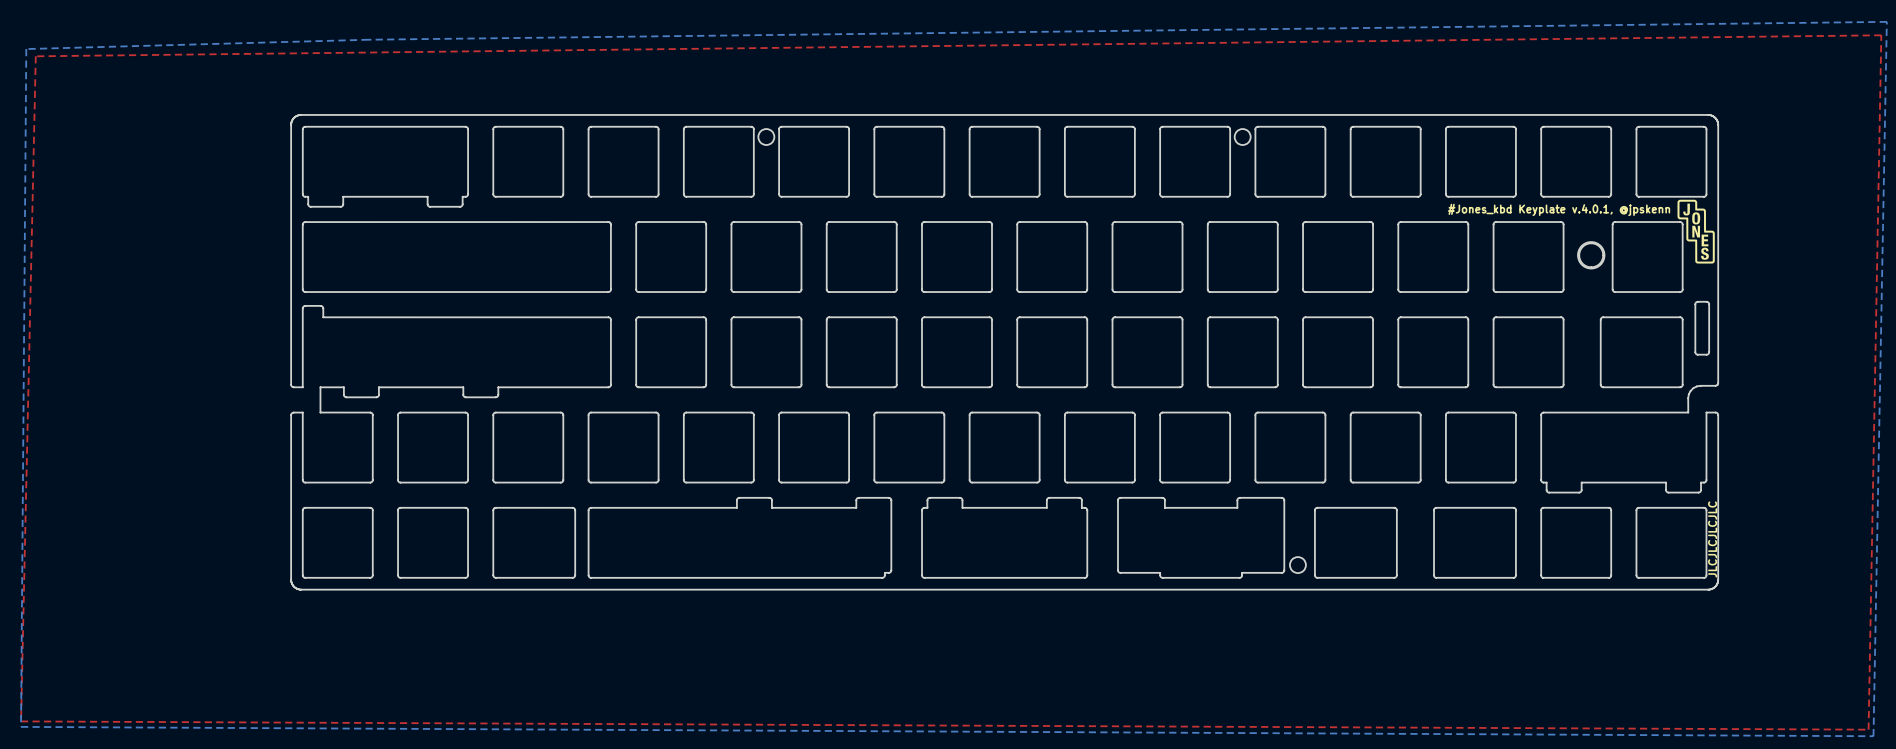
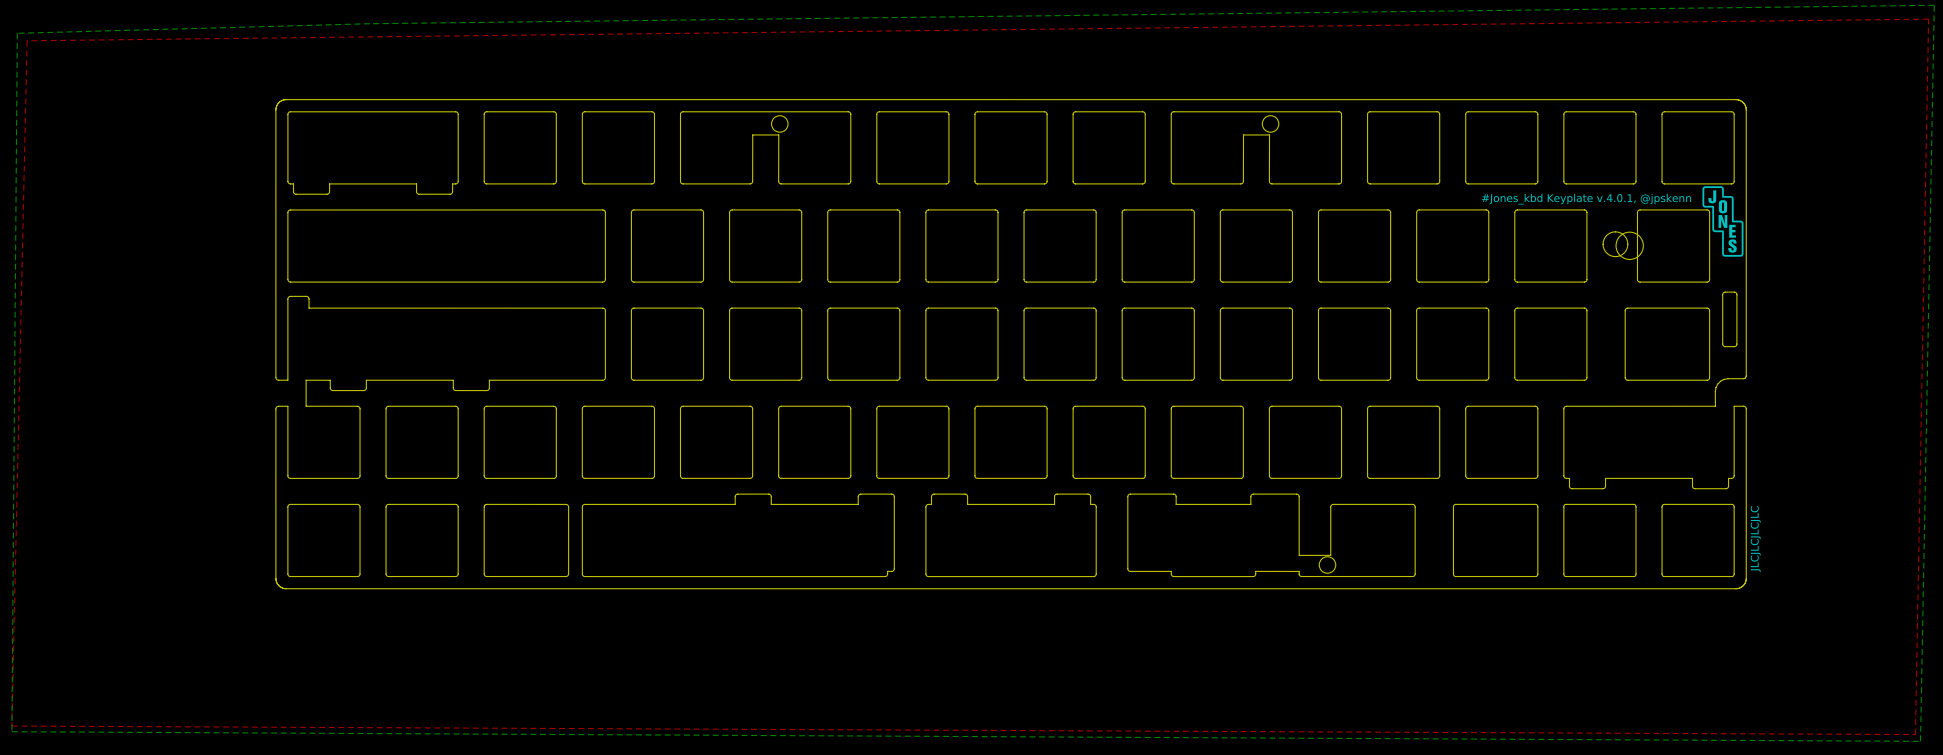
board edge: (1708, 114) (298, 115) (293, 119) (291, 124) (292, 386) (302, 387) (302, 308) (305, 305) (322, 306) (323, 317) (608, 317) (610, 319) (610, 384) (608, 387) (498, 387) (498, 395) (495, 397) (465, 397) (463, 387) (378, 387) (377, 397) (346, 397) (343, 395) (343, 387) (320, 387) (320, 412) (372, 413) (372, 480) (370, 482) (303, 482) (302, 412) (291, 413) (291, 582) (295, 587) (301, 589) (1711, 589) (1716, 585) (1718, 579) (1717, 412) (1706, 412) (1706, 480) (1701, 482) (1699, 492) (1667, 492) (1666, 482) (1581, 482) (1579, 492) (1548, 492) (1546, 490) (1546, 482) (1541, 480) (1542, 412) (1688, 412) (1688, 394) (1693, 388) (1717, 385) (1718, 124) (1715, 117) (1708, 114) -> (1735, 99) (1743, 102) (1746, 109) (1745, 377) (1720, 381) (1715, 387) (1715, 406) (1565, 406) (1563, 475) (1569, 478) (1569, 486) (1571, 488) (1603, 488) (1605, 478) (1692, 478) (1694, 488) (1726, 488) (1728, 478) (1734, 476) (1734, 406) (1745, 406) (1746, 578) (1744, 584) (1739, 588) (286, 588) (280, 586) (276, 581) (276, 407) (287, 406) (288, 477) (357, 478) (360, 476) (359, 407) (306, 406) (306, 380) (330, 380) (330, 388) (332, 390) (364, 390) (366, 380) (453, 380) (455, 390) (486, 390) (489, 388) (489, 380) (602, 380) (605, 377) (605, 310) (603, 308) (309, 308) (307, 296) (290, 296) (287, 299) (287, 380) (276, 379) (275, 109) (277, 103) (283, 100) (1735, 99)
board edge: none -> (848, 111) (682, 111) (680, 114) (680, 182) (683, 183) (751, 183) (752, 134) (778, 134) (779, 183) (849, 183) (850, 181) (850, 114) (848, 111)
board edge: none -> (1338, 111) (1172, 111) (1171, 114) (1171, 182) (1173, 183) (1241, 183) (1243, 134) (1269, 134) (1270, 183) (1339, 183) (1341, 181) (1341, 114) (1338, 111)
board edge: (465, 126) (304, 126) (302, 195) (308, 196) (308, 204) (310, 206) (341, 206) (343, 196) (427, 196) (429, 206) (461, 206) (462, 196) (468, 194) (468, 129) (465, 126) -> (455, 111) (289, 112) (287, 114) (288, 182) (293, 183) (293, 192) (295, 194) (327, 194) (329, 183) (416, 183) (418, 194) (451, 194) (452, 183) (458, 181) (458, 114) (455, 111)
board edge: (560, 126) (494, 127) (494, 196) (562, 196) (563, 129) (560, 126) -> (553, 111) (484, 112) (484, 183) (555, 183) (556, 114) (553, 111)
board edge: (656, 126) (589, 127) (589, 196) (657, 196) (658, 129) (656, 126) -> (651, 111) (583, 112) (583, 183) (653, 183) (654, 114) (651, 111)
board edge: (751, 126) (684, 127) (684, 196) (753, 196) (753, 129) (751, 126) -> none
board edge: (846, 126) (779, 127) (779, 196) (848, 196) (849, 129) (846, 126) -> none
board edge: (941, 126) (875, 127) (875, 196) (943, 196) (944, 129) (941, 126) -> (946, 111) (877, 112) (877, 183) (948, 183) (948, 114) (946, 111)
board edge: (1037, 126) (970, 127) (970, 196) (1038, 196) (1039, 129) (1037, 126) -> (1044, 111) (975, 112) (975, 183) (1046, 183) (1047, 114) (1044, 111)
board edge: (1132, 126) (1065, 127) (1065, 196) (1134, 196) (1134, 129) (1132, 126) -> (1142, 111) (1073, 112) (1073, 183) (1144, 183) (1145, 114) (1142, 111)
board edge: (1227, 126) (1160, 127) (1160, 196) (1229, 196) (1230, 129) (1227, 126) -> none
board edge: (1322, 126) (1256, 127) (1256, 196) (1324, 196) (1325, 129) (1322, 126) -> none
board edge: (1418, 126) (1351, 127) (1351, 196) (1419, 196) (1420, 129) (1418, 126) -> (1437, 111) (1368, 112) (1368, 183) (1438, 183) (1439, 114) (1437, 111)
board edge: (1513, 126) (1446, 127) (1446, 196) (1515, 196) (1515, 129) (1513, 126) -> (1535, 111) (1466, 112) (1466, 183) (1537, 183) (1537, 114) (1535, 111)
board edge: (1608, 126) (1541, 127) (1541, 196) (1610, 196) (1611, 129) (1608, 126) -> (1633, 111) (1564, 112) (1564, 183) (1635, 183) (1636, 114) (1633, 111)
board edge: (1703, 126) (1637, 127) (1637, 196) (1705, 196) (1706, 129) (1703, 126) -> (1731, 111) (1662, 112) (1662, 183) (1733, 183) (1734, 114) (1731, 111)
drawing: none -> [1702, 186, 1744, 257]
drawing: [1677, 199, 1715, 264] -> none
board edge: (608, 222) (610, 224) (610, 289) (608, 291) (305, 292) (302, 289) (302, 224) (304, 222) (608, 222) -> (602, 209) (605, 212) (605, 279) (603, 282) (290, 282) (287, 279) (287, 212) (290, 210) (602, 209)
board edge: (703, 222) (636, 222) (636, 291) (705, 291) (706, 224) (703, 222) -> (700, 209) (632, 210) (632, 281) (702, 281) (703, 212) (700, 209)
board edge: (798, 222) (732, 222) (732, 291) (800, 291) (801, 224) (798, 222) -> (799, 209) (730, 210) (730, 281) (800, 281) (801, 212) (799, 209)
board edge: (894, 222) (827, 222) (827, 291) (895, 291) (896, 224) (894, 222) -> (897, 209) (828, 210) (828, 281) (899, 281) (899, 212) (897, 209)
board edge: (989, 222) (922, 222) (922, 291) (991, 291) (991, 224) (989, 222) -> (995, 209) (926, 210) (926, 281) (997, 281) (998, 212) (995, 209)
board edge: (1084, 222) (1017, 222) (1017, 291) (1086, 291) (1087, 224) (1084, 222) -> (1093, 209) (1024, 210) (1024, 281) (1095, 281) (1096, 212) (1093, 209)
board edge: (1180, 222) (1113, 222) (1113, 291) (1181, 291) (1182, 224) (1180, 222) -> (1191, 209) (1122, 210) (1122, 281) (1193, 281) (1194, 212) (1191, 209)
board edge: (1275, 222) (1208, 222) (1208, 291) (1277, 291) (1277, 224) (1275, 222) -> (1289, 209) (1221, 210) (1221, 281) (1291, 281) (1292, 212) (1289, 209)
board edge: (1370, 222) (1303, 222) (1303, 291) (1372, 291) (1373, 224) (1370, 222) -> (1388, 209) (1319, 210) (1319, 281) (1389, 281) (1390, 212) (1388, 209)
board edge: (1465, 222) (1399, 222) (1399, 291) (1467, 291) (1468, 224) (1465, 222) -> (1486, 209) (1417, 210) (1417, 281) (1488, 281) (1488, 212) (1486, 209)
board edge: (1561, 222) (1494, 222) (1494, 291) (1562, 291) (1563, 224) (1561, 222) -> (1584, 209) (1515, 210) (1515, 281) (1586, 281) (1586, 212) (1584, 209)
board edge: (1680, 222) (1613, 222) (1613, 291) (1681, 291) (1682, 224) (1680, 222) -> (1707, 209) (1638, 210) (1638, 281) (1708, 281) (1709, 212) (1707, 209)
board edge: (1591, 243) (1582, 246) (1579, 255) (1582, 263) (1591, 267) (1599, 263) (1603, 255) (1599, 246) (1591, 243) -> (1615, 231) (1606, 235) (1603, 244) (1606, 252) (1615, 256) (1624, 252) (1627, 244) (1624, 235) (1615, 231)
board edge: (1706, 301) (1709, 304) (1709, 352) (1707, 354) (1697, 354) (1695, 352) (1695, 303) (1697, 301) (1706, 301) -> (1734, 292) (1736, 294) (1736, 344) (1734, 346) (1724, 346) (1722, 344) (1722, 294) (1724, 292) (1734, 292)
board edge: (703, 317) (636, 318) (636, 386) (705, 386) (706, 319) (703, 317) -> (700, 308) (632, 308) (632, 379) (702, 379) (703, 310) (700, 308)
board edge: (798, 317) (732, 318) (732, 386) (800, 386) (801, 319) (798, 317) -> (799, 308) (730, 308) (730, 379) (800, 379) (801, 310) (799, 308)
board edge: (894, 317) (827, 318) (827, 386) (895, 386) (896, 319) (894, 317) -> (897, 308) (828, 308) (828, 379) (899, 379) (899, 310) (897, 308)
board edge: (989, 317) (922, 318) (922, 386) (991, 386) (991, 319) (989, 317) -> (995, 308) (926, 308) (926, 379) (997, 379) (998, 310) (995, 308)
board edge: (1084, 317) (1017, 318) (1017, 386) (1086, 386) (1087, 319) (1084, 317) -> (1093, 308) (1024, 308) (1024, 379) (1095, 379) (1096, 310) (1093, 308)
board edge: (1180, 317) (1113, 318) (1113, 386) (1181, 386) (1182, 319) (1180, 317) -> (1191, 308) (1122, 308) (1122, 379) (1193, 379) (1194, 310) (1191, 308)
board edge: (1275, 317) (1208, 318) (1208, 386) (1277, 386) (1277, 319) (1275, 317) -> (1289, 308) (1221, 308) (1221, 379) (1291, 379) (1292, 310) (1289, 308)
board edge: (1370, 317) (1303, 318) (1303, 386) (1372, 386) (1373, 319) (1370, 317) -> (1388, 308) (1319, 308) (1319, 379) (1389, 379) (1390, 310) (1388, 308)
board edge: (1465, 317) (1399, 318) (1399, 386) (1467, 386) (1468, 319) (1465, 317) -> (1486, 308) (1417, 308) (1417, 379) (1488, 379) (1488, 310) (1486, 308)
board edge: (1561, 317) (1494, 318) (1494, 386) (1562, 386) (1563, 319) (1561, 317) -> (1584, 308) (1515, 308) (1515, 379) (1586, 379) (1586, 310) (1584, 308)
board edge: (1680, 317) (1601, 317) (1601, 386) (1681, 386) (1682, 319) (1680, 317) -> (1707, 308) (1626, 308) (1625, 379) (1708, 379) (1709, 310) (1707, 308)
board edge: (465, 412) (398, 413) (398, 481) (467, 481) (468, 415) (465, 412) -> (455, 406) (386, 407) (386, 477) (457, 477) (458, 408) (455, 406)
board edge: (560, 412) (494, 413) (494, 481) (562, 481) (563, 415) (560, 412) -> (553, 406) (484, 407) (484, 477) (555, 477) (556, 408) (553, 406)
board edge: (656, 412) (589, 413) (589, 481) (657, 481) (658, 415) (656, 412) -> (651, 406) (583, 407) (583, 477) (653, 477) (654, 408) (651, 406)
board edge: (751, 412) (684, 413) (684, 481) (753, 481) (753, 415) (751, 412) -> (750, 406) (681, 407) (681, 477) (751, 477) (752, 408) (750, 406)
board edge: (846, 412) (779, 413) (779, 481) (848, 481) (849, 415) (846, 412) -> (848, 406) (779, 407) (779, 477) (850, 477) (850, 408) (848, 406)
board edge: (941, 412) (875, 413) (875, 481) (943, 481) (944, 415) (941, 412) -> (946, 406) (877, 407) (877, 477) (948, 477) (948, 408) (946, 406)
board edge: (1037, 412) (970, 413) (970, 481) (1038, 481) (1039, 415) (1037, 412) -> (1044, 406) (975, 407) (975, 477) (1046, 477) (1047, 408) (1044, 406)
board edge: (1132, 412) (1065, 413) (1065, 481) (1134, 481) (1134, 415) (1132, 412) -> (1142, 406) (1073, 407) (1073, 477) (1144, 477) (1145, 408) (1142, 406)
board edge: (1227, 412) (1160, 413) (1160, 481) (1229, 481) (1230, 415) (1227, 412) -> (1240, 406) (1172, 407) (1172, 477) (1242, 477) (1243, 408) (1240, 406)
board edge: (1322, 412) (1256, 413) (1256, 481) (1324, 481) (1325, 415) (1322, 412) -> (1338, 406) (1270, 407) (1270, 477) (1340, 477) (1341, 408) (1338, 406)
board edge: (1418, 412) (1351, 413) (1351, 481) (1419, 481) (1420, 415) (1418, 412) -> (1437, 406) (1368, 407) (1368, 477) (1438, 477) (1439, 408) (1437, 406)
board edge: (1513, 412) (1446, 413) (1446, 481) (1515, 481) (1515, 415) (1513, 412) -> (1535, 406) (1466, 407) (1466, 477) (1537, 477) (1537, 408) (1535, 406)
board edge: (888, 497) (858, 497) (856, 507) (771, 507) (770, 497) (739, 497) (736, 499) (736, 507) (590, 507) (588, 510) (588, 576) (591, 577) (883, 577) (884, 572) (891, 570) (891, 500) (888, 497) -> (891, 494) (860, 494) (858, 504) (771, 504) (769, 494) (737, 494) (735, 496) (735, 504) (584, 504) (582, 507) (582, 574) (584, 576) (885, 576) (887, 571) (894, 569) (894, 496) (891, 494)
board edge: (1079, 497) (1048, 497) (1046, 507) (962, 507) (960, 497) (928, 498) (927, 507) (922, 510) (922, 576) (1085, 577) (1087, 510) (1081, 507) (1081, 499) (1079, 497) -> (1088, 494) (1056, 494) (1054, 504) (967, 504) (965, 494) (932, 494) (931, 504) (925, 506) (926, 575) (1094, 576) (1096, 506) (1090, 504) (1090, 496) (1088, 494)
board edge: (1281, 497) (1239, 497) (1237, 499) (1237, 507) (1164, 507) (1164, 499) (1162, 497) (1119, 498) (1118, 571) (1160, 572) (1162, 577) (1239, 577) (1242, 572) (1282, 572) (1284, 500) (1281, 497) -> (1296, 494) (1299, 496) (1299, 555) (1330, 555) (1330, 506) (1332, 504) (1414, 504) (1414, 575) (1301, 576) (1299, 571) (1255, 571) (1253, 576) (1173, 576) (1171, 571) (1128, 569) (1127, 496) (1129, 494) (1174, 494) (1176, 496) (1176, 504) (1250, 504) (1250, 496) (1252, 494) (1296, 494)
board edge: (370, 507) (303, 508) (303, 577) (372, 577) (372, 510) (370, 507) -> (357, 504) (288, 505) (288, 575) (359, 575) (360, 506) (357, 504)
board edge: (465, 507) (398, 508) (398, 577) (467, 577) (468, 510) (465, 507) -> (455, 504) (386, 505) (386, 575) (457, 575) (458, 506) (455, 504)
board edge: (572, 507) (575, 510) (574, 577) (493, 576) (494, 508) (572, 507) -> (565, 504) (568, 507) (567, 575) (484, 575) (485, 505) (565, 504)
board edge: (1394, 507) (1315, 508) (1315, 576) (1395, 577) (1396, 510) (1394, 507) -> none
board edge: (1513, 507) (1434, 508) (1434, 577) (1515, 577) (1515, 510) (1513, 507) -> (1535, 504) (1454, 504) (1454, 575) (1537, 575) (1537, 506) (1535, 504)
board edge: (1609, 507) (1541, 508) (1542, 577) (1610, 577) (1611, 510) (1609, 507) -> (1634, 504) (1564, 504) (1564, 576) (1635, 575) (1636, 506) (1634, 504)
board edge: (1704, 507) (1637, 508) (1637, 577) (1705, 577) (1706, 510) (1704, 507) -> (1731, 504) (1662, 504) (1662, 575) (1733, 575) (1734, 506) (1731, 504)

